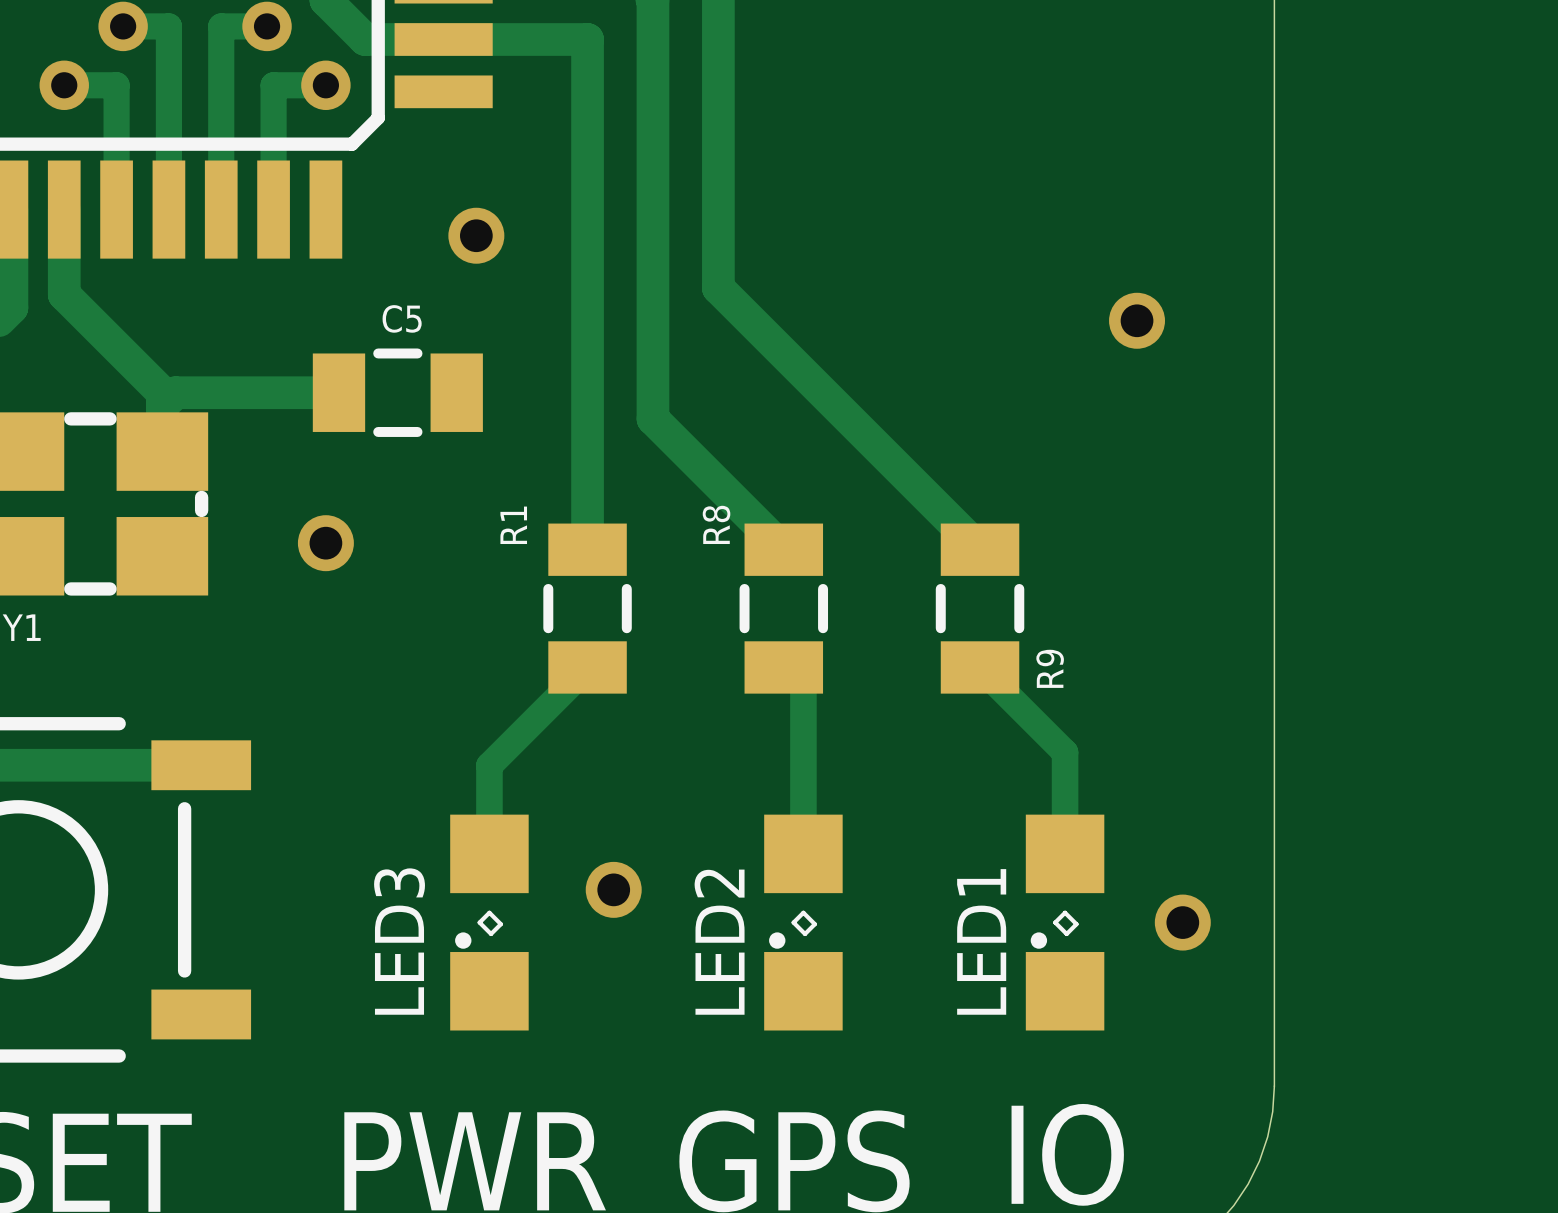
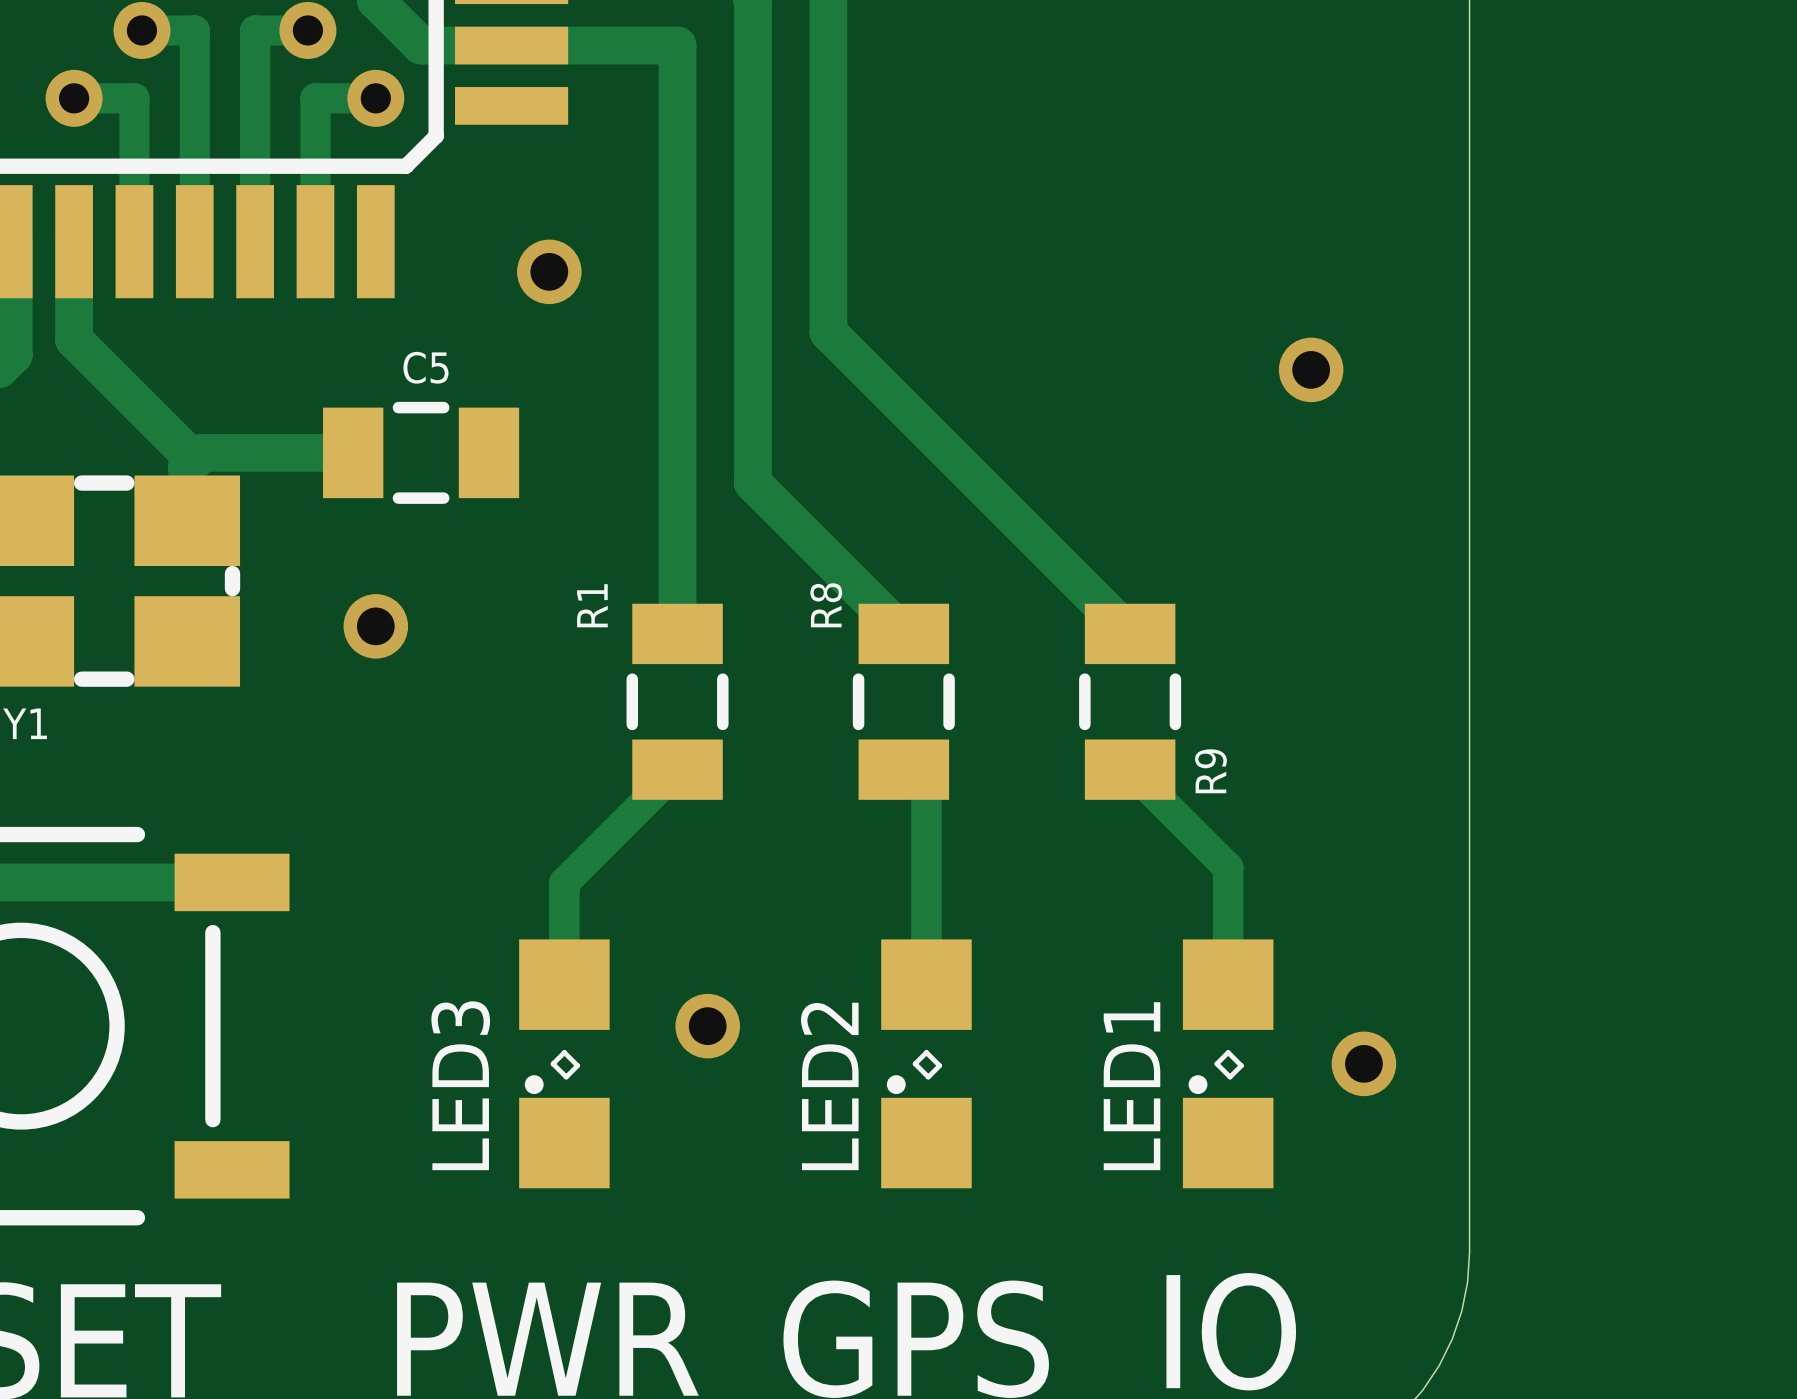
C5 position: (397, 392) -> (421, 452)

